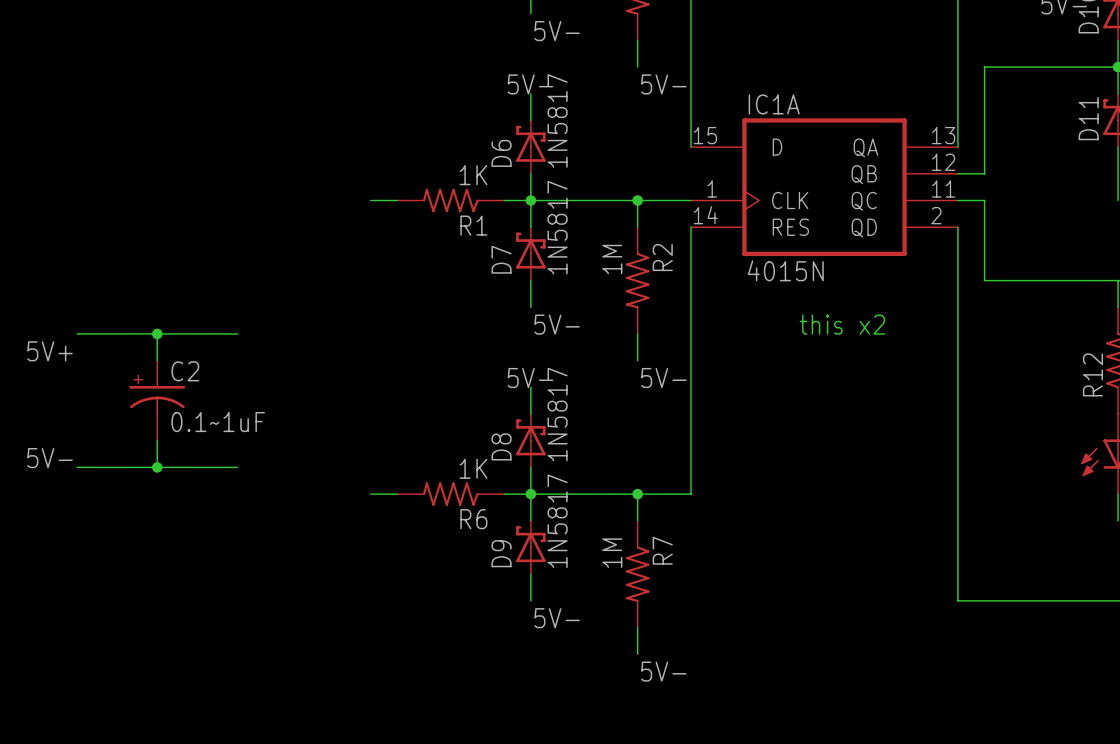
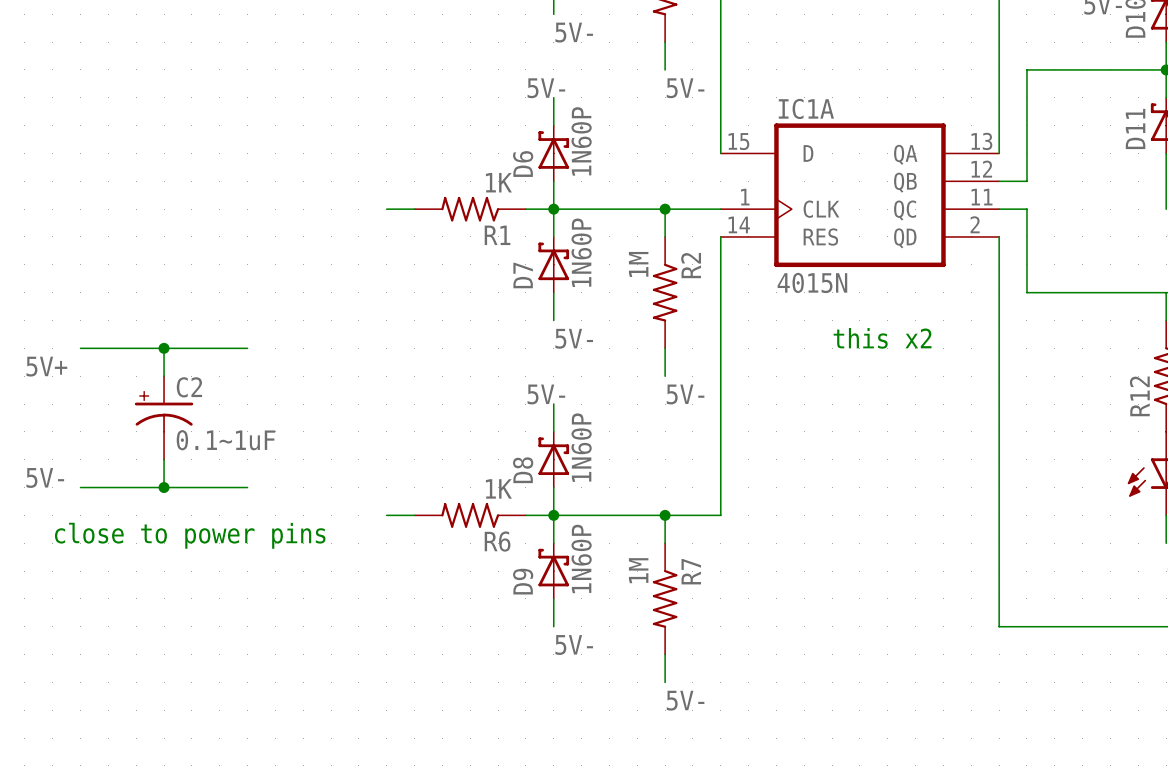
D6 value: 1N5817 (557, 120) -> 1N60P (581, 141)
D7 value: 1N5817 (557, 227) -> 1N60P (581, 252)
D8 value: 1N5817 (557, 414) -> 1N60P (581, 447)
text: none -> close to power pins (190, 535)
D9 value: 1N5817 (557, 521) -> 1N60P (581, 558)

